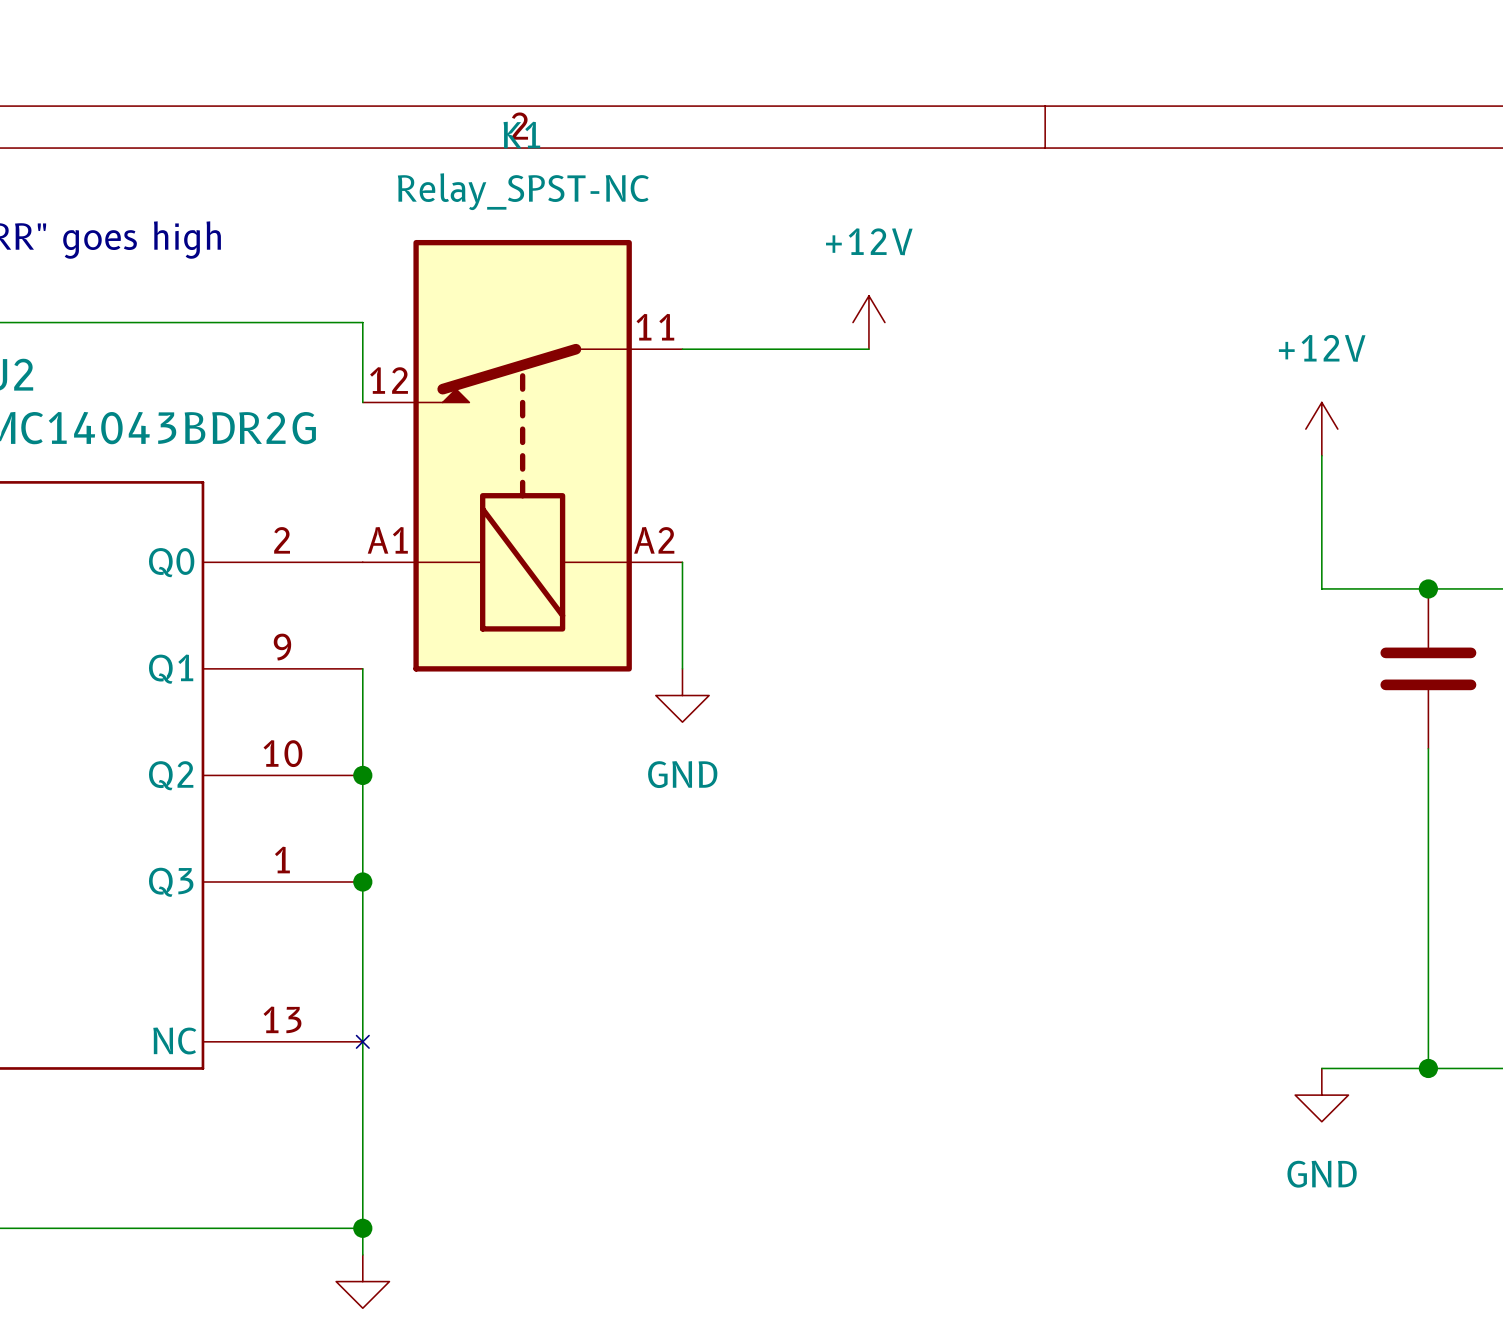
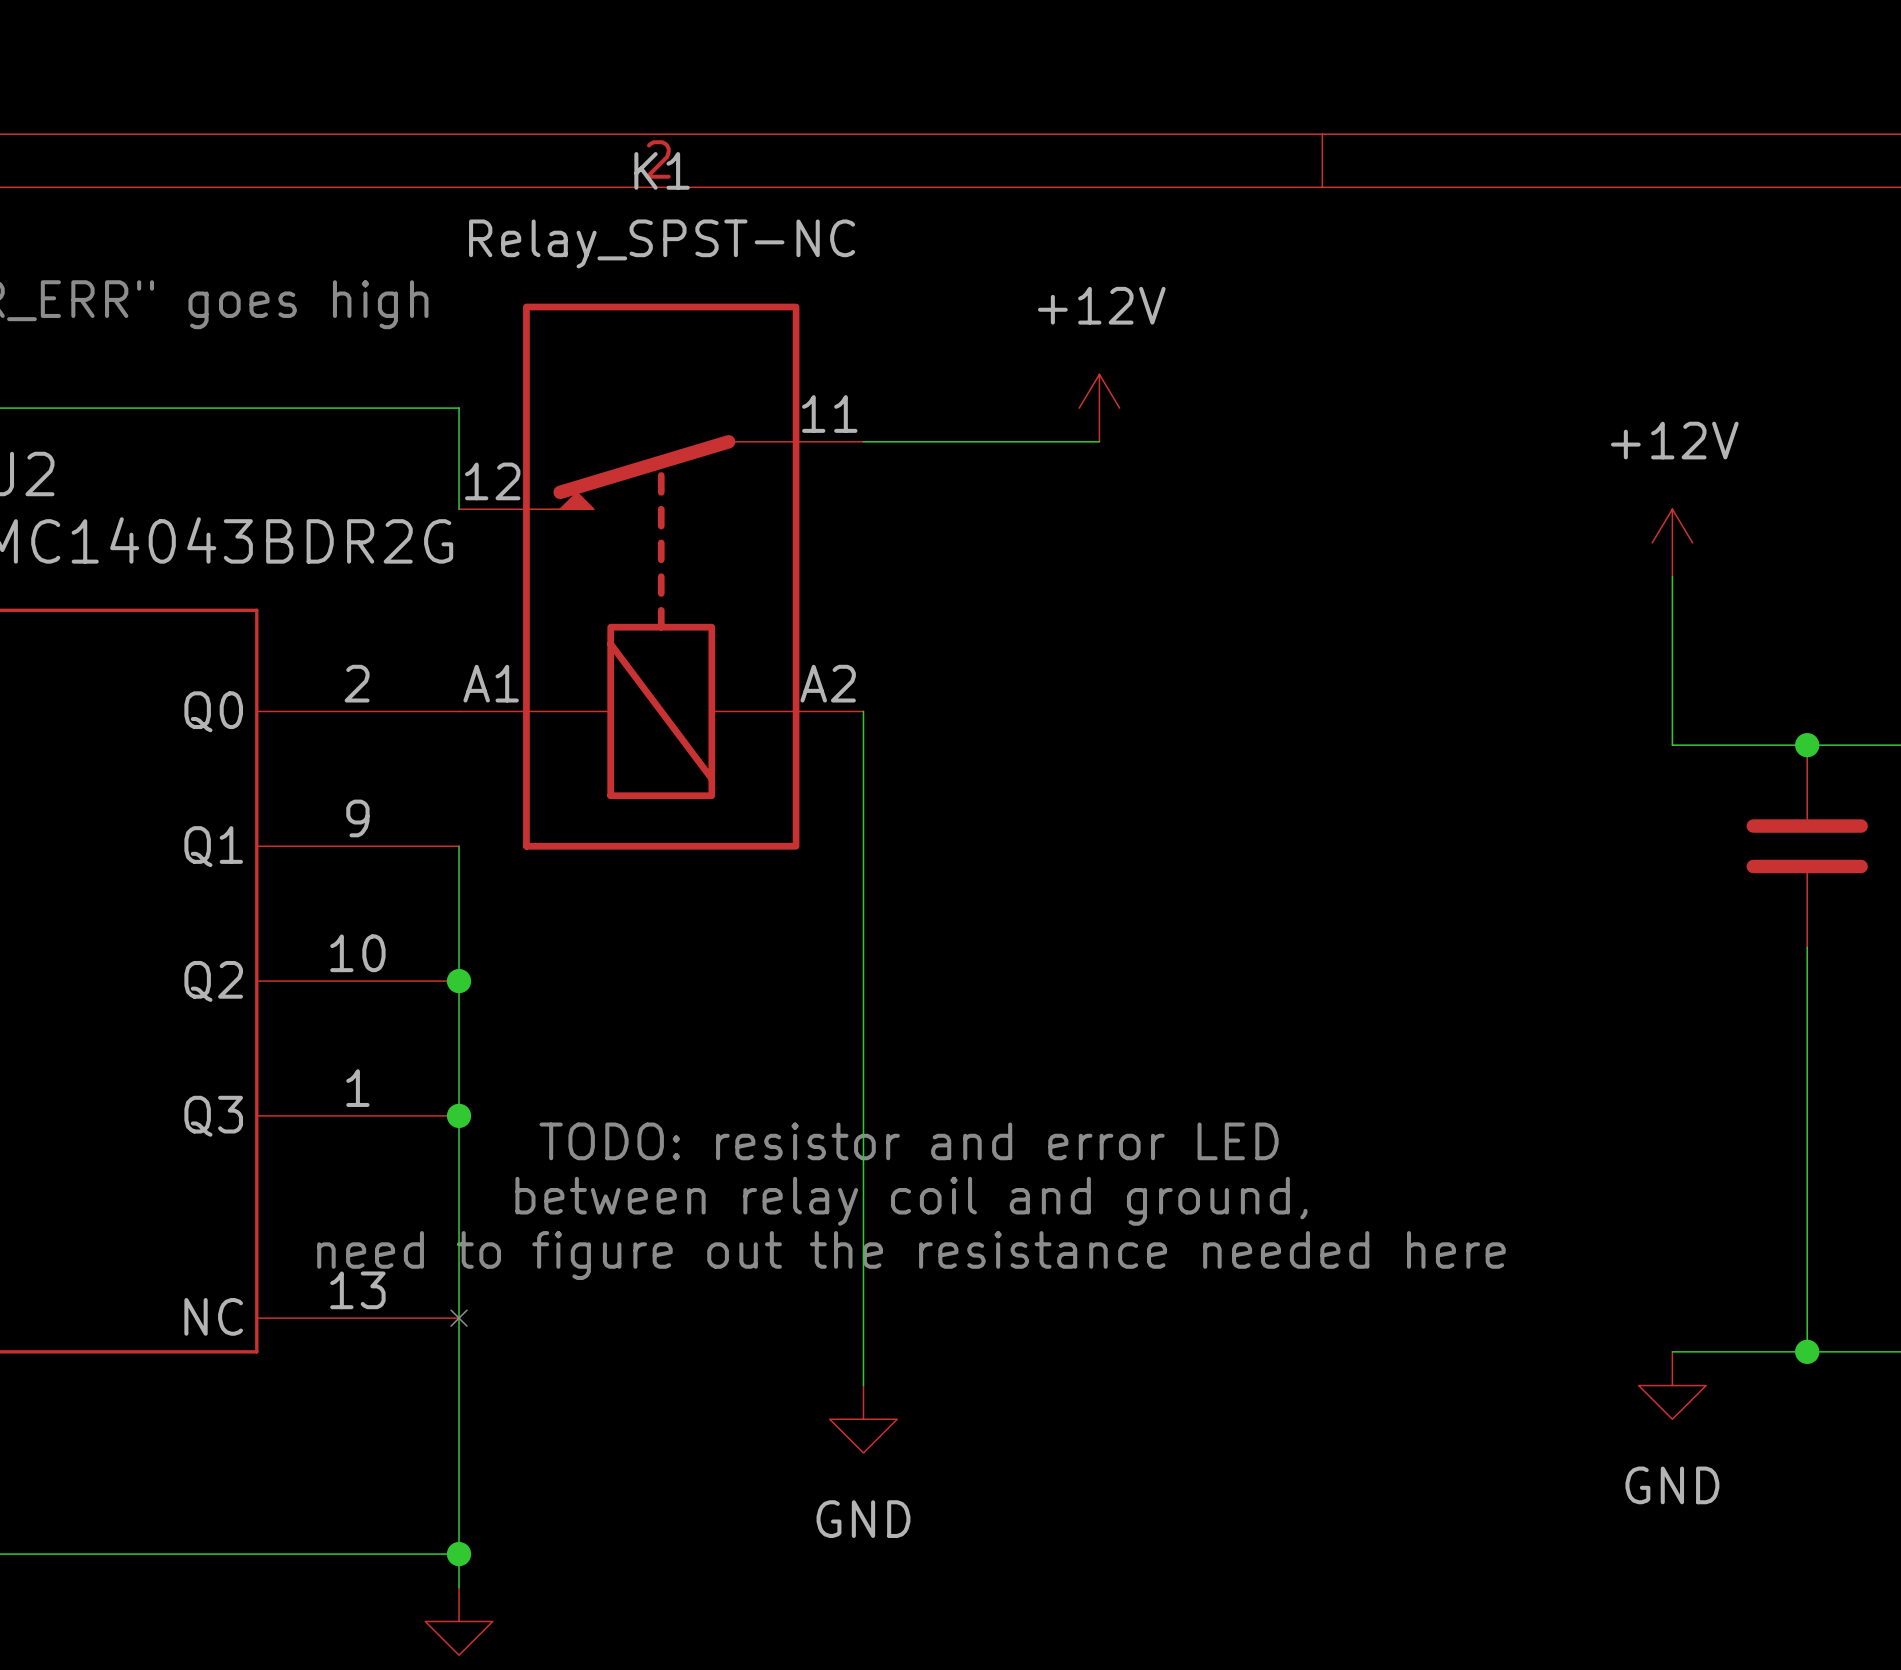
wire: none -> (863, 846) (863, 1385)
power symbol position: GND (682, 695) -> GND (863, 1419)
text: none -> TODO: resistor and error LED (909, 1141)
text: none -> between relay coil and ground, (911, 1201)
text: none -> need to figure out the resistance needed here (911, 1255)

